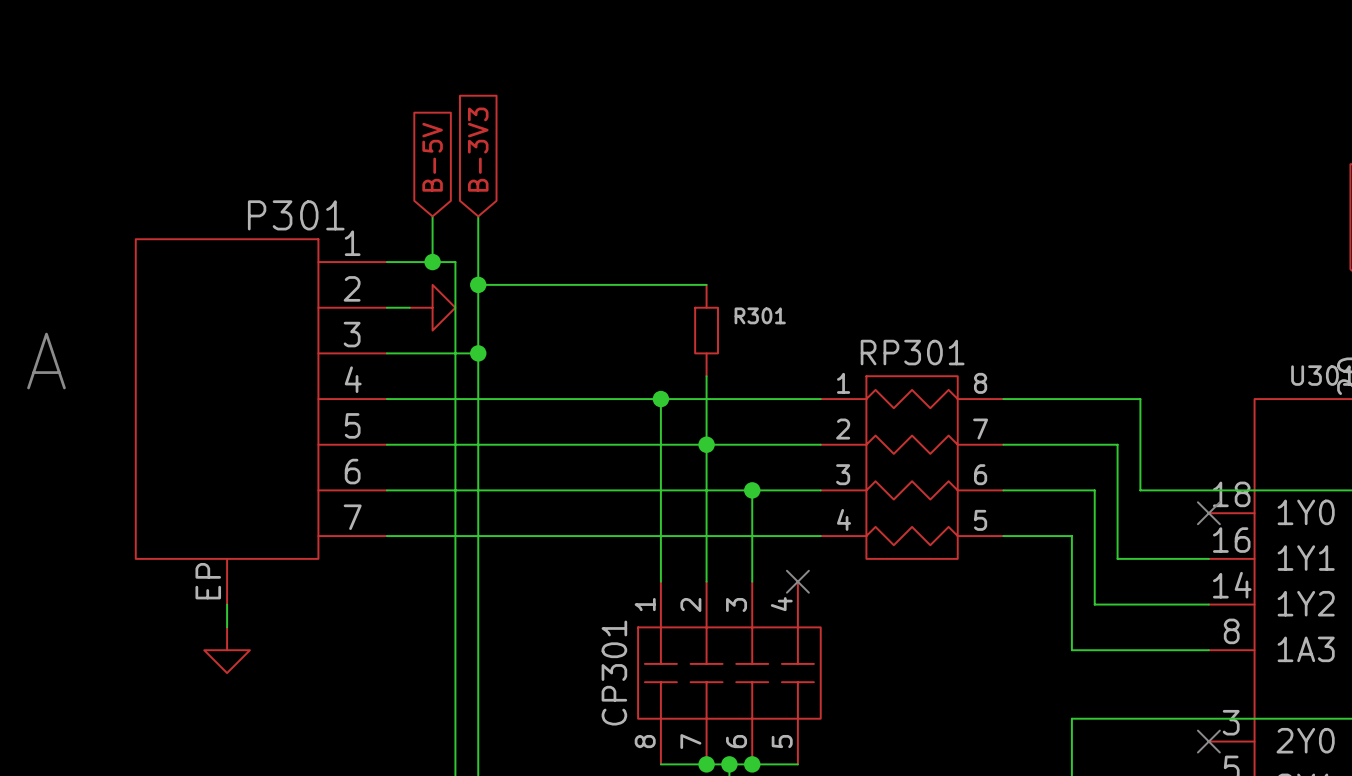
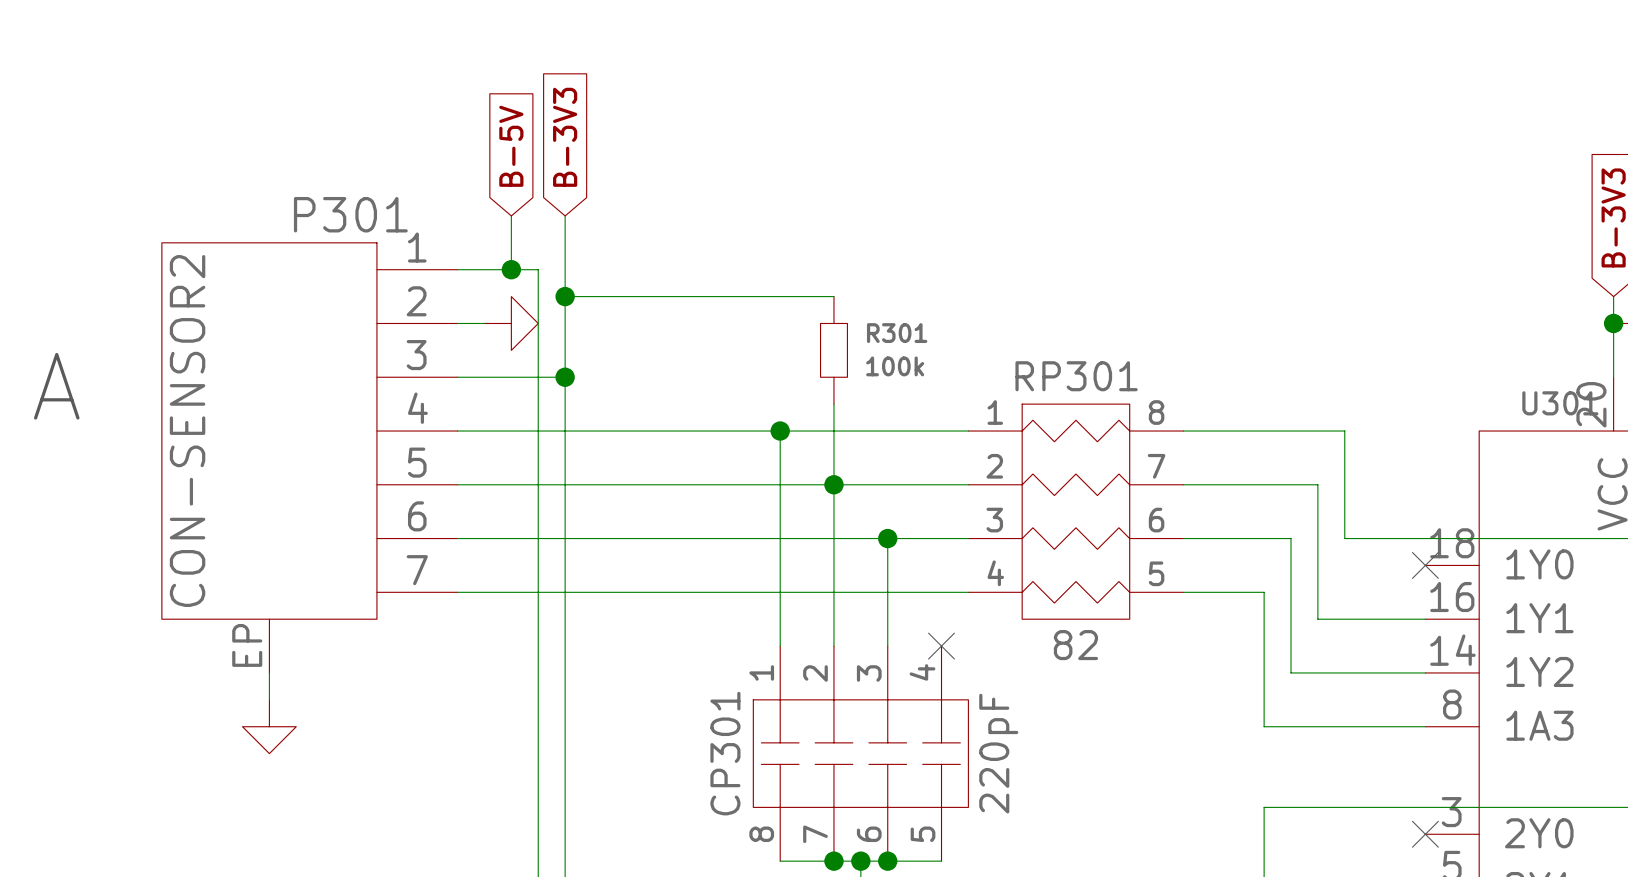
R301 value: none -> 100k (895, 366)
P301 value: none -> CON-SENSOR2 (187, 431)
RP301 value: none -> 82 (1075, 645)
CP301 value: none -> 220pF (998, 753)

